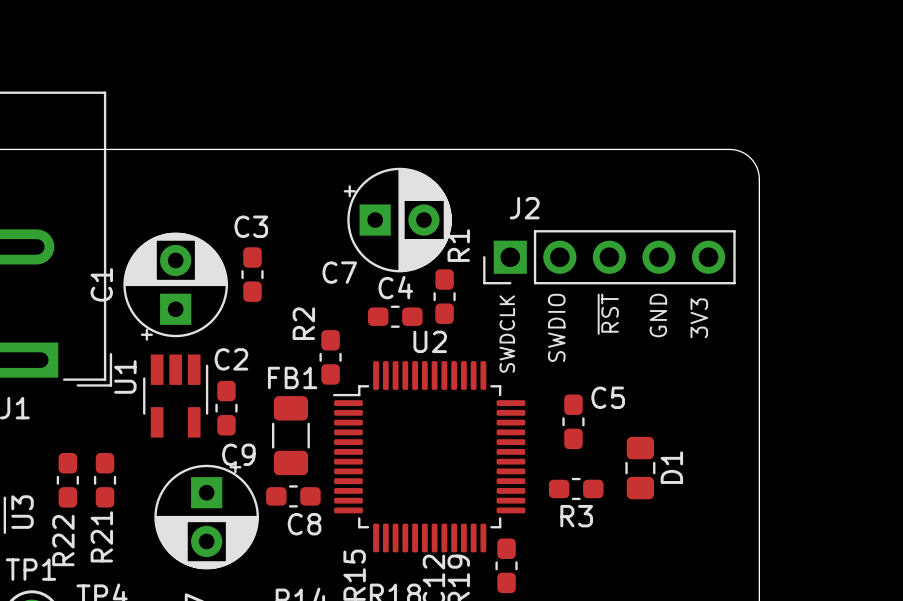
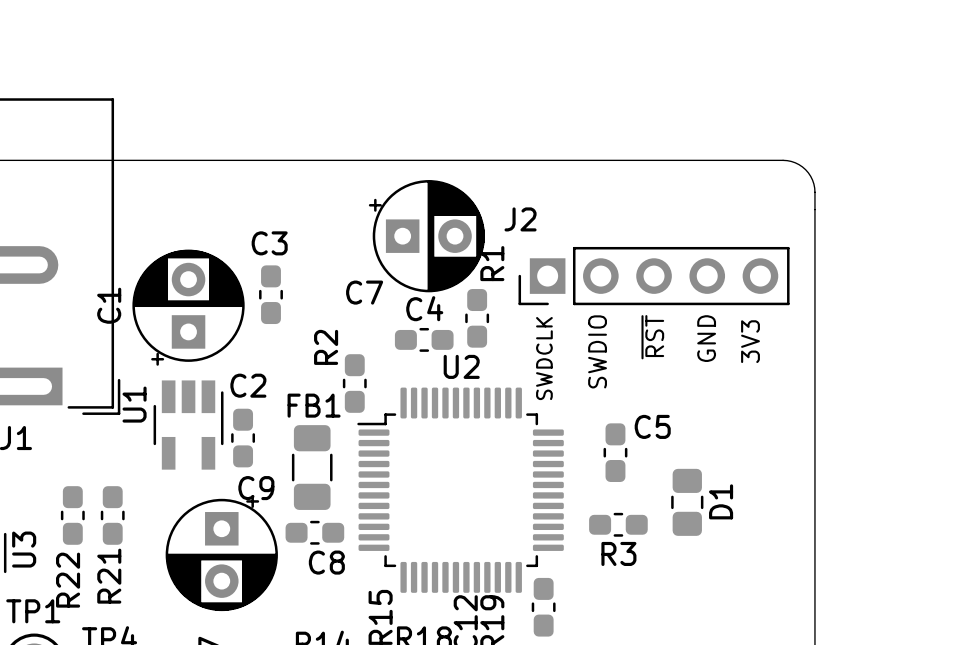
J2 name position: J2 (524, 208) -> J2 (520, 219)

